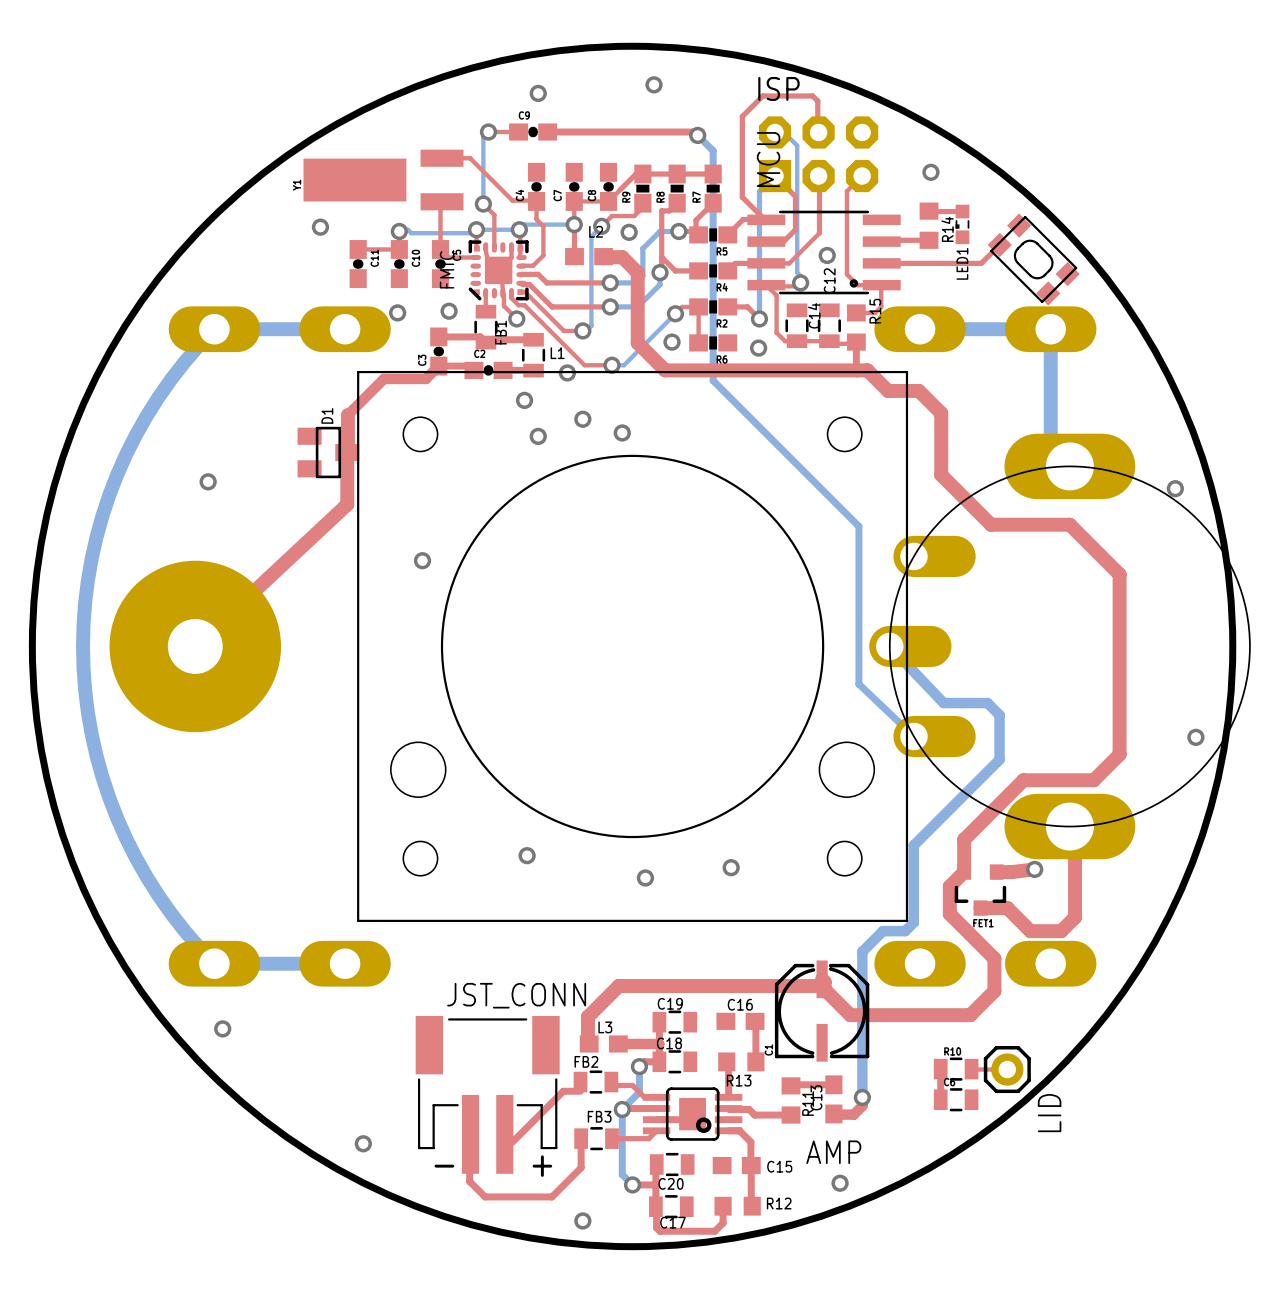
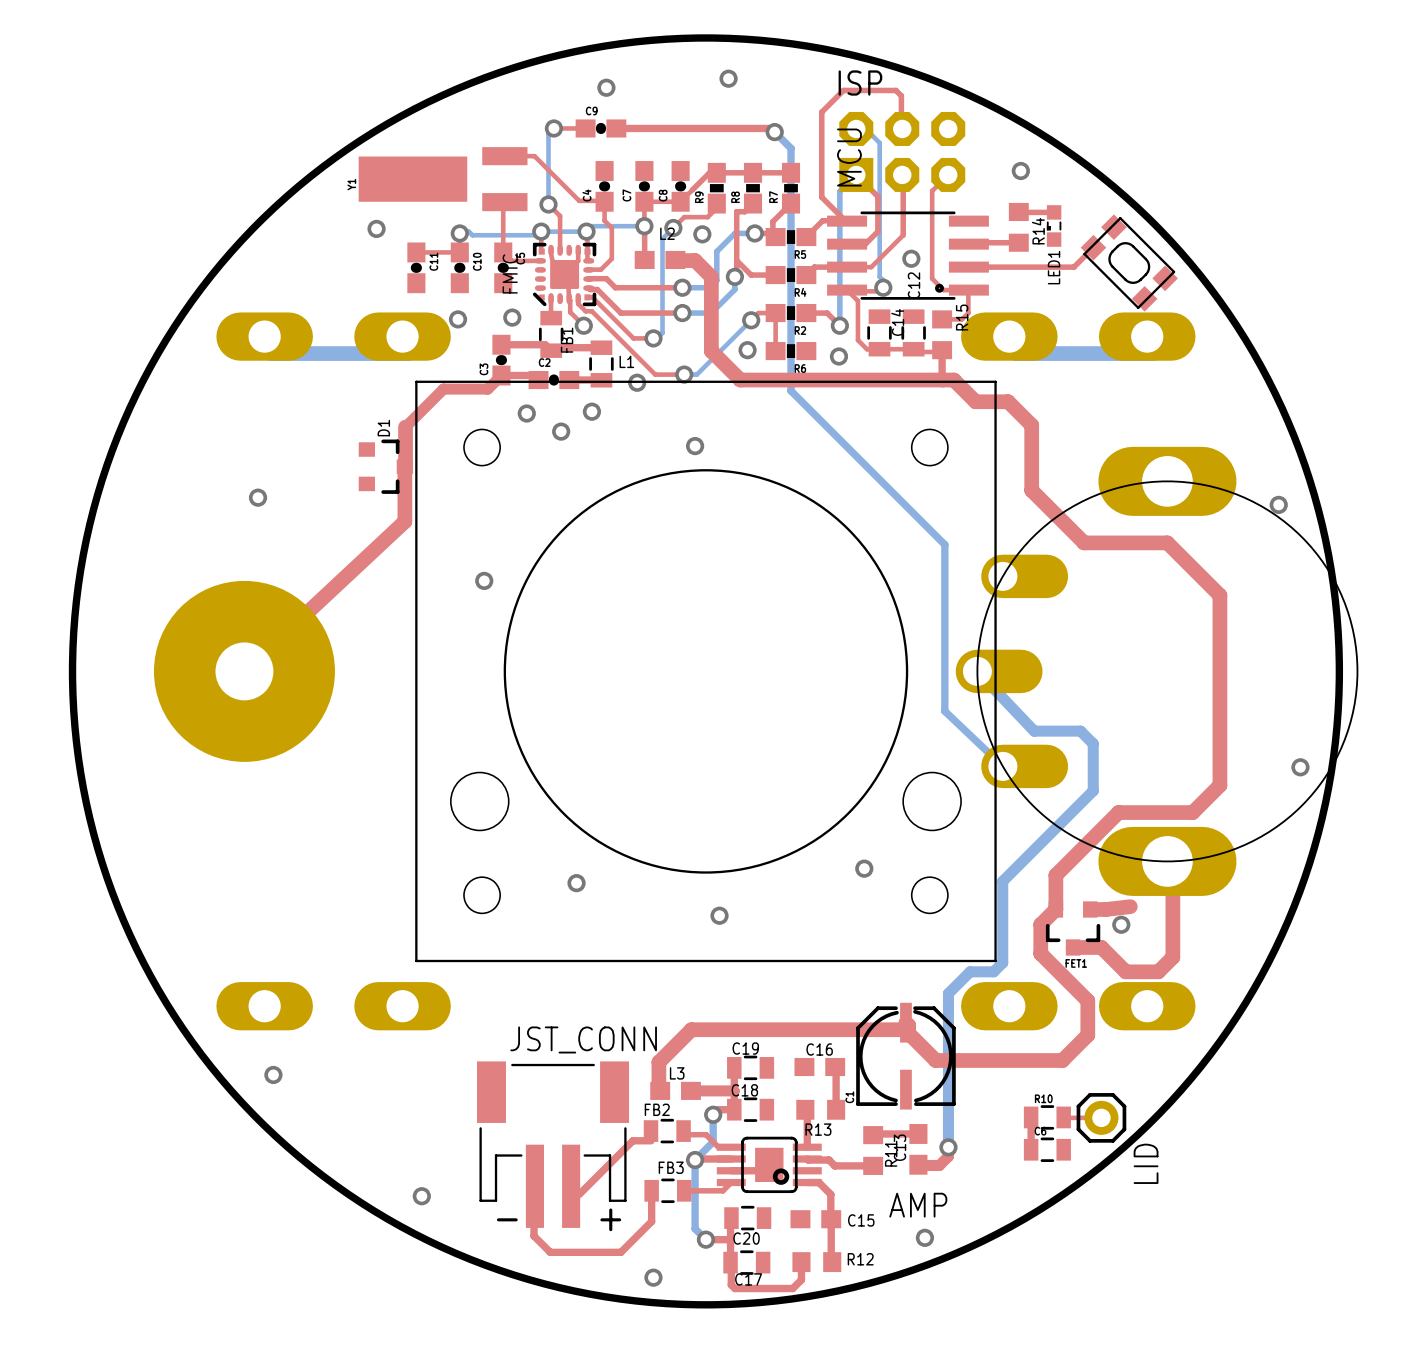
bottom track: (345, 329) (214, 329) (184, 361) (158, 397) (135, 434) (109, 495) (96, 537) (87, 580) (83, 646) (87, 712) (96, 755) (109, 797) (135, 857) (158, 895) (184, 931) (214, 963) (345, 963) -> none
bottom track: (920, 329) (1050, 329) (1050, 447) (1069, 466) -> none
bottom track: none -> (270, 353) (408, 353)
bottom track: none -> (1015, 353) (1153, 353)
via: none -> (526, 413)
via: none -> (561, 431)
via: (582, 419) -> none
D1 footprint: [297, 426, 360, 479] -> [358, 439, 414, 494]
via: (538, 436) -> none
via position: (527, 855) -> (576, 883)
via position: (731, 867) -> (864, 868)
via position: (1034, 869) -> (1121, 924)

